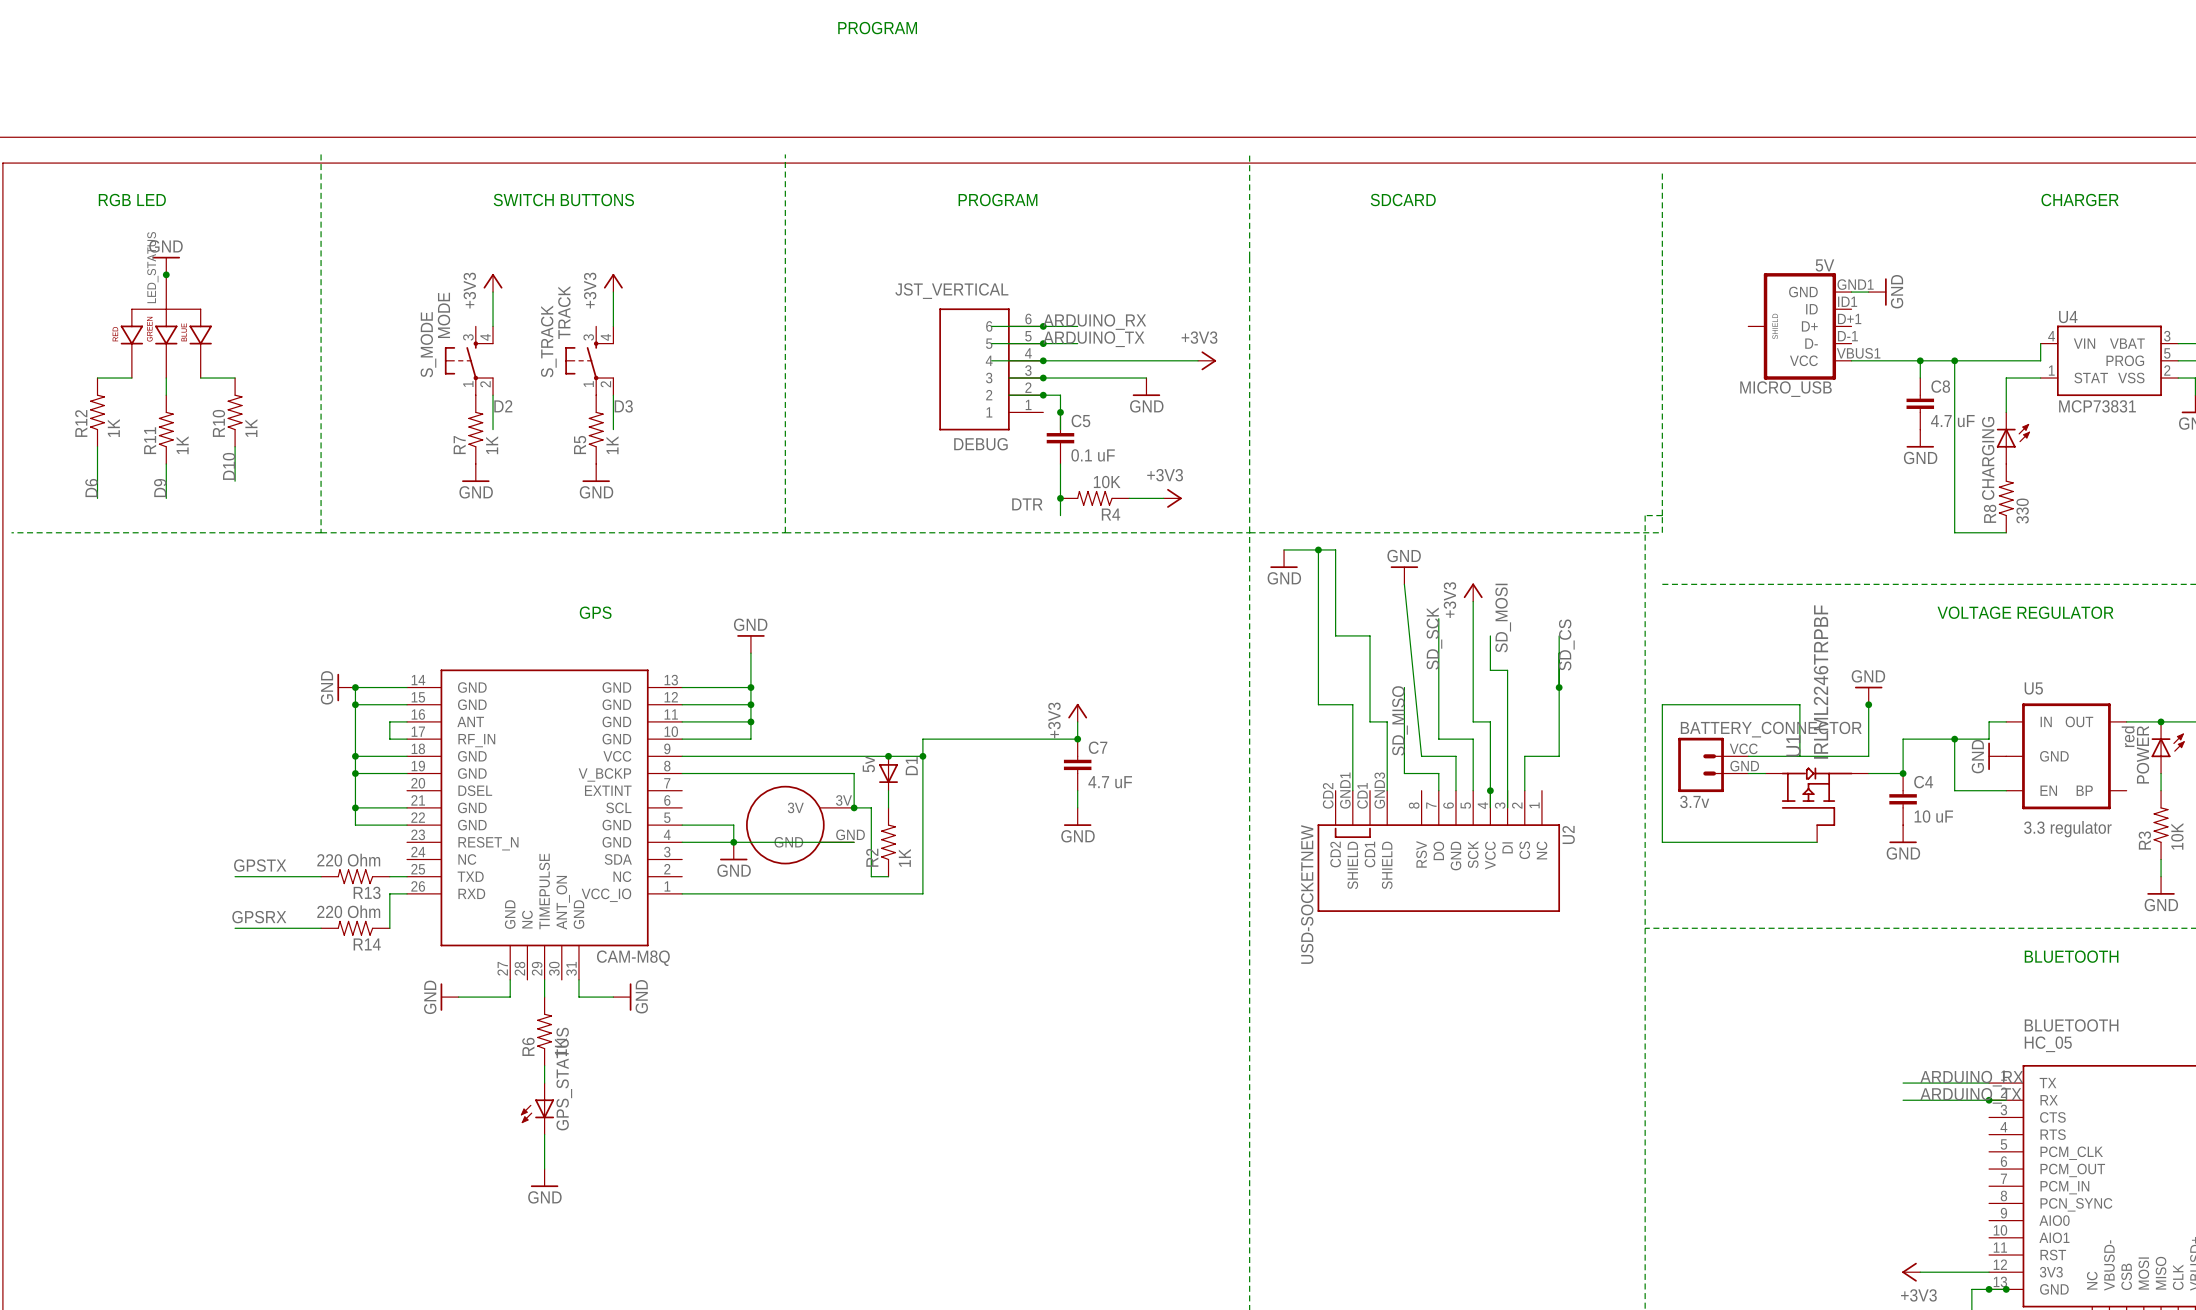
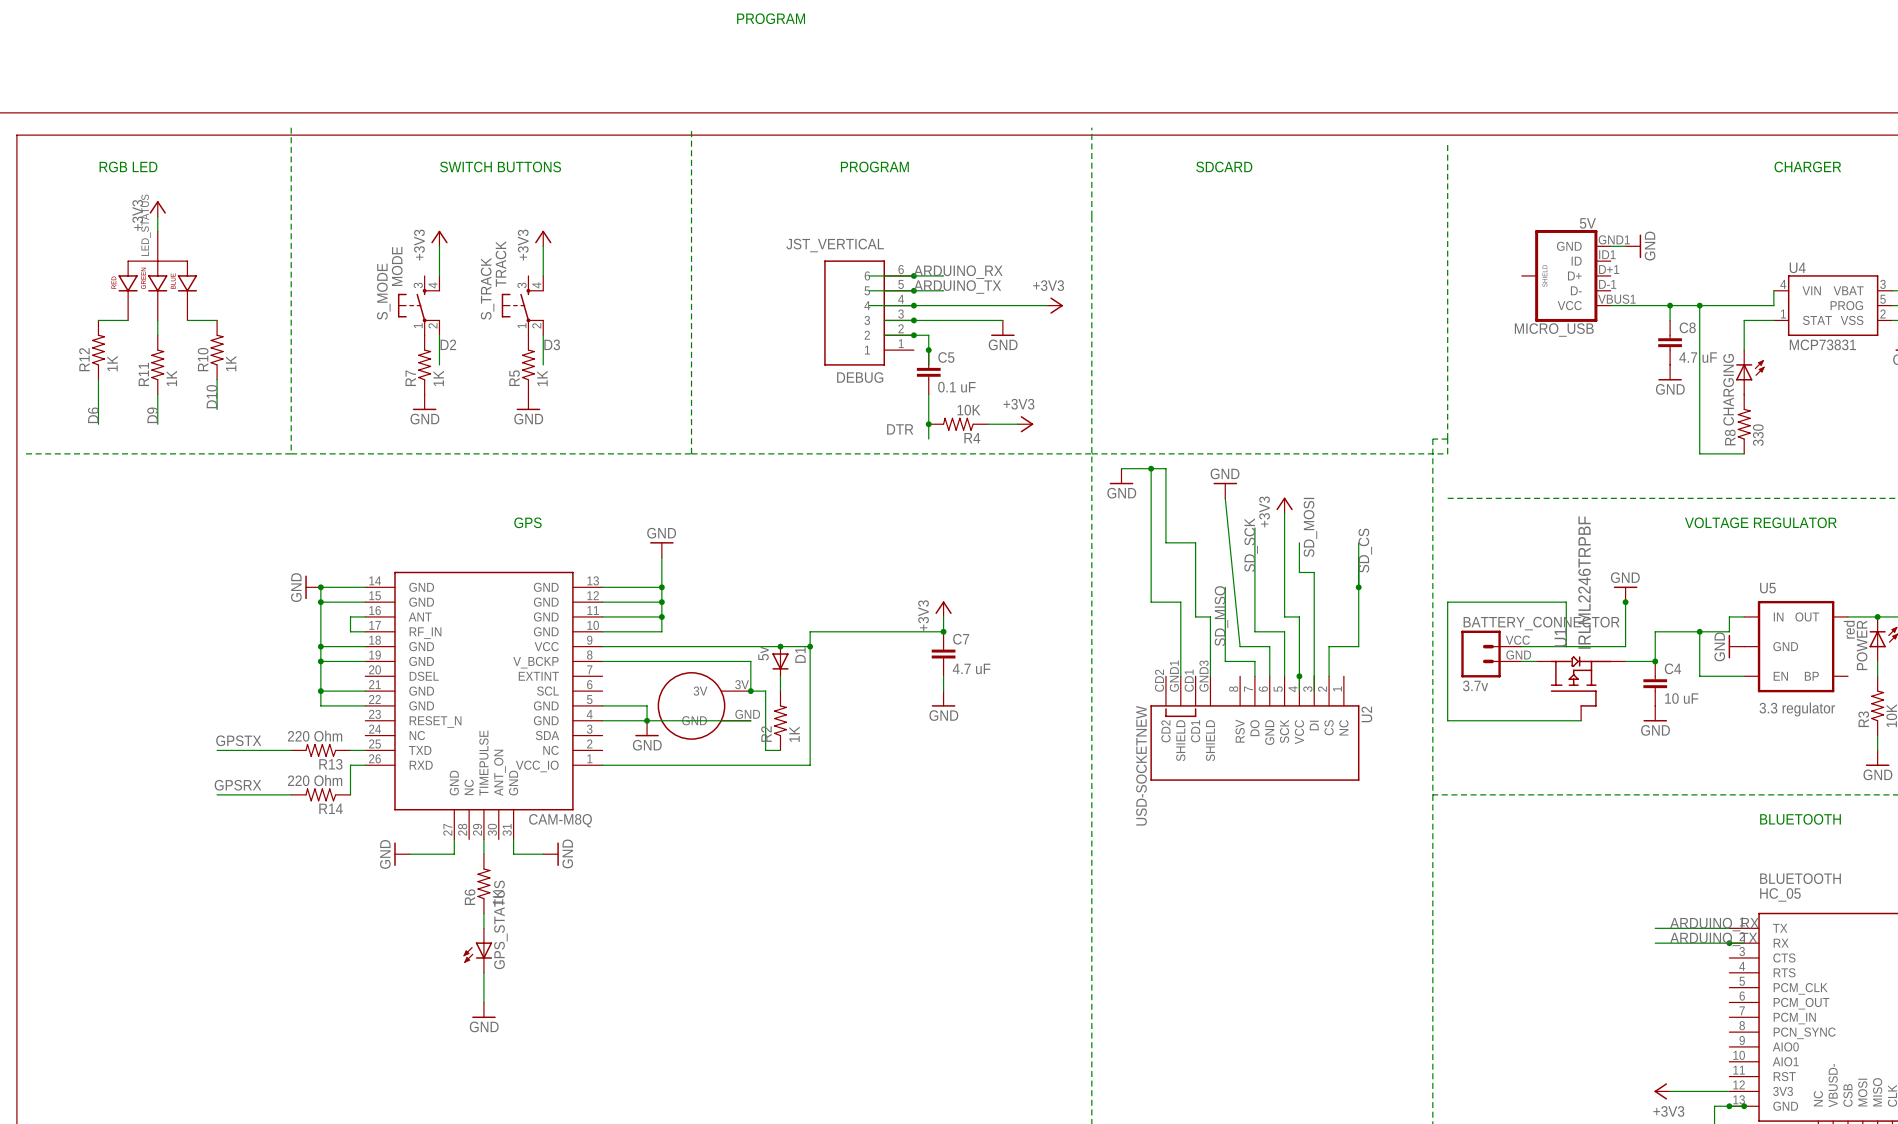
power symbol: none -> +3V3 (157, 208)
power symbol: GND (166, 265) -> none
junction: (166, 274) -> none

